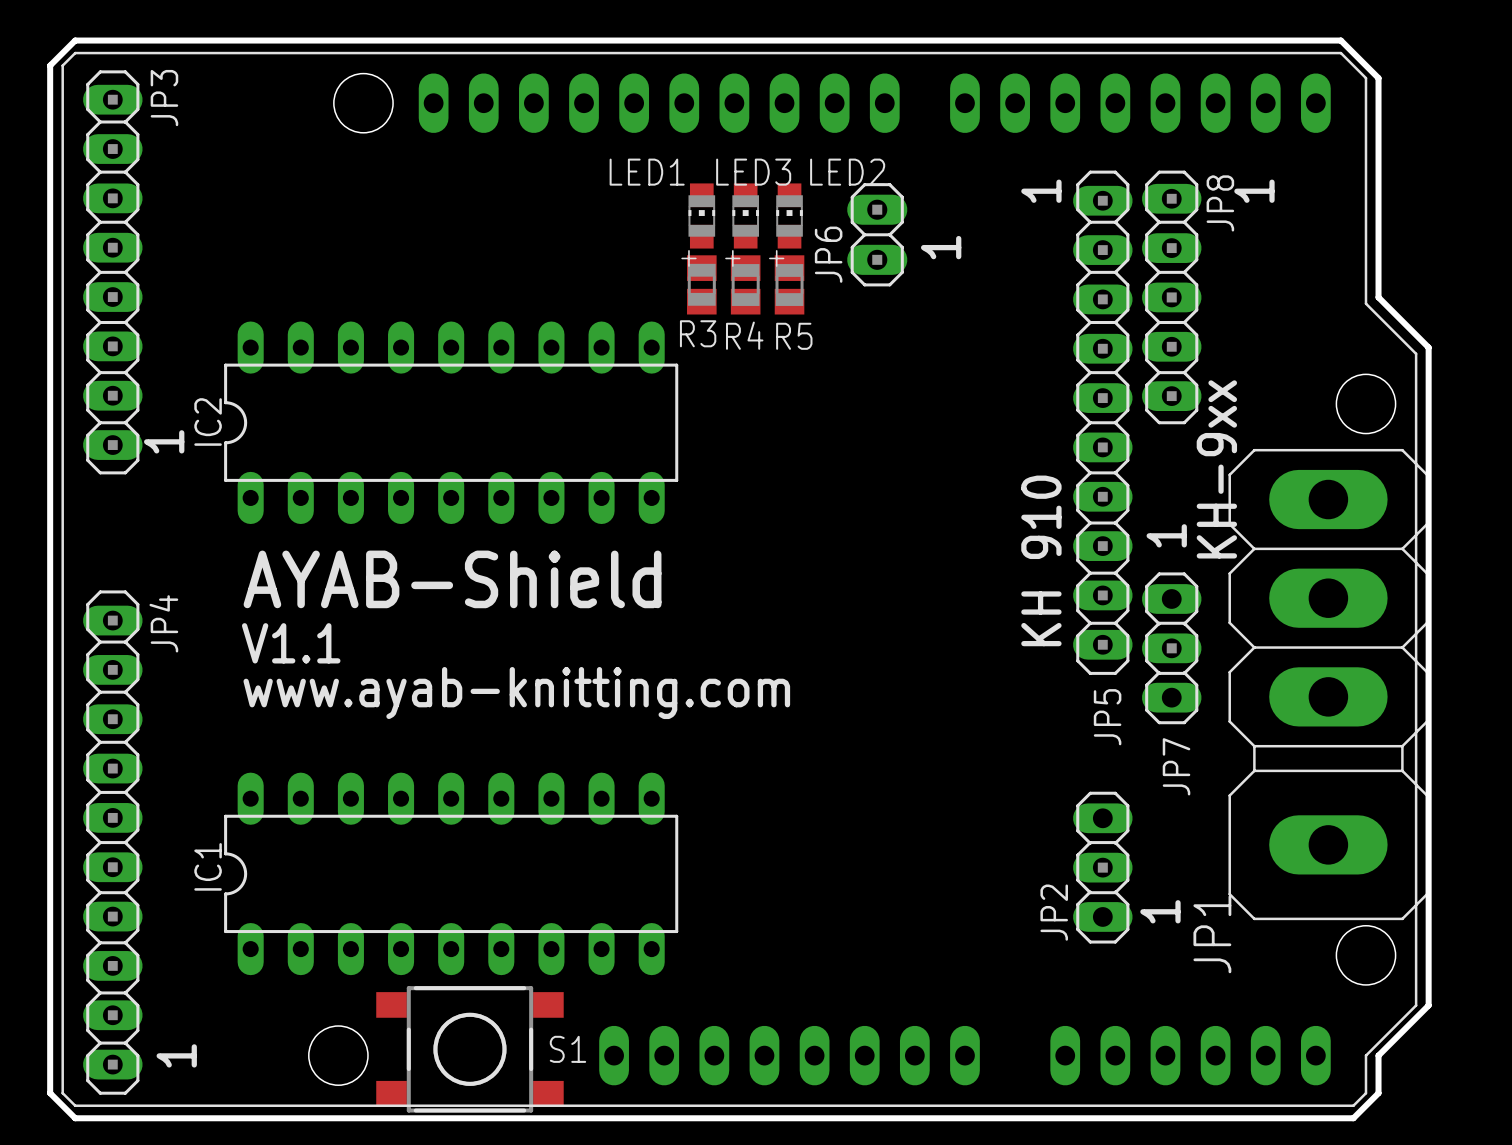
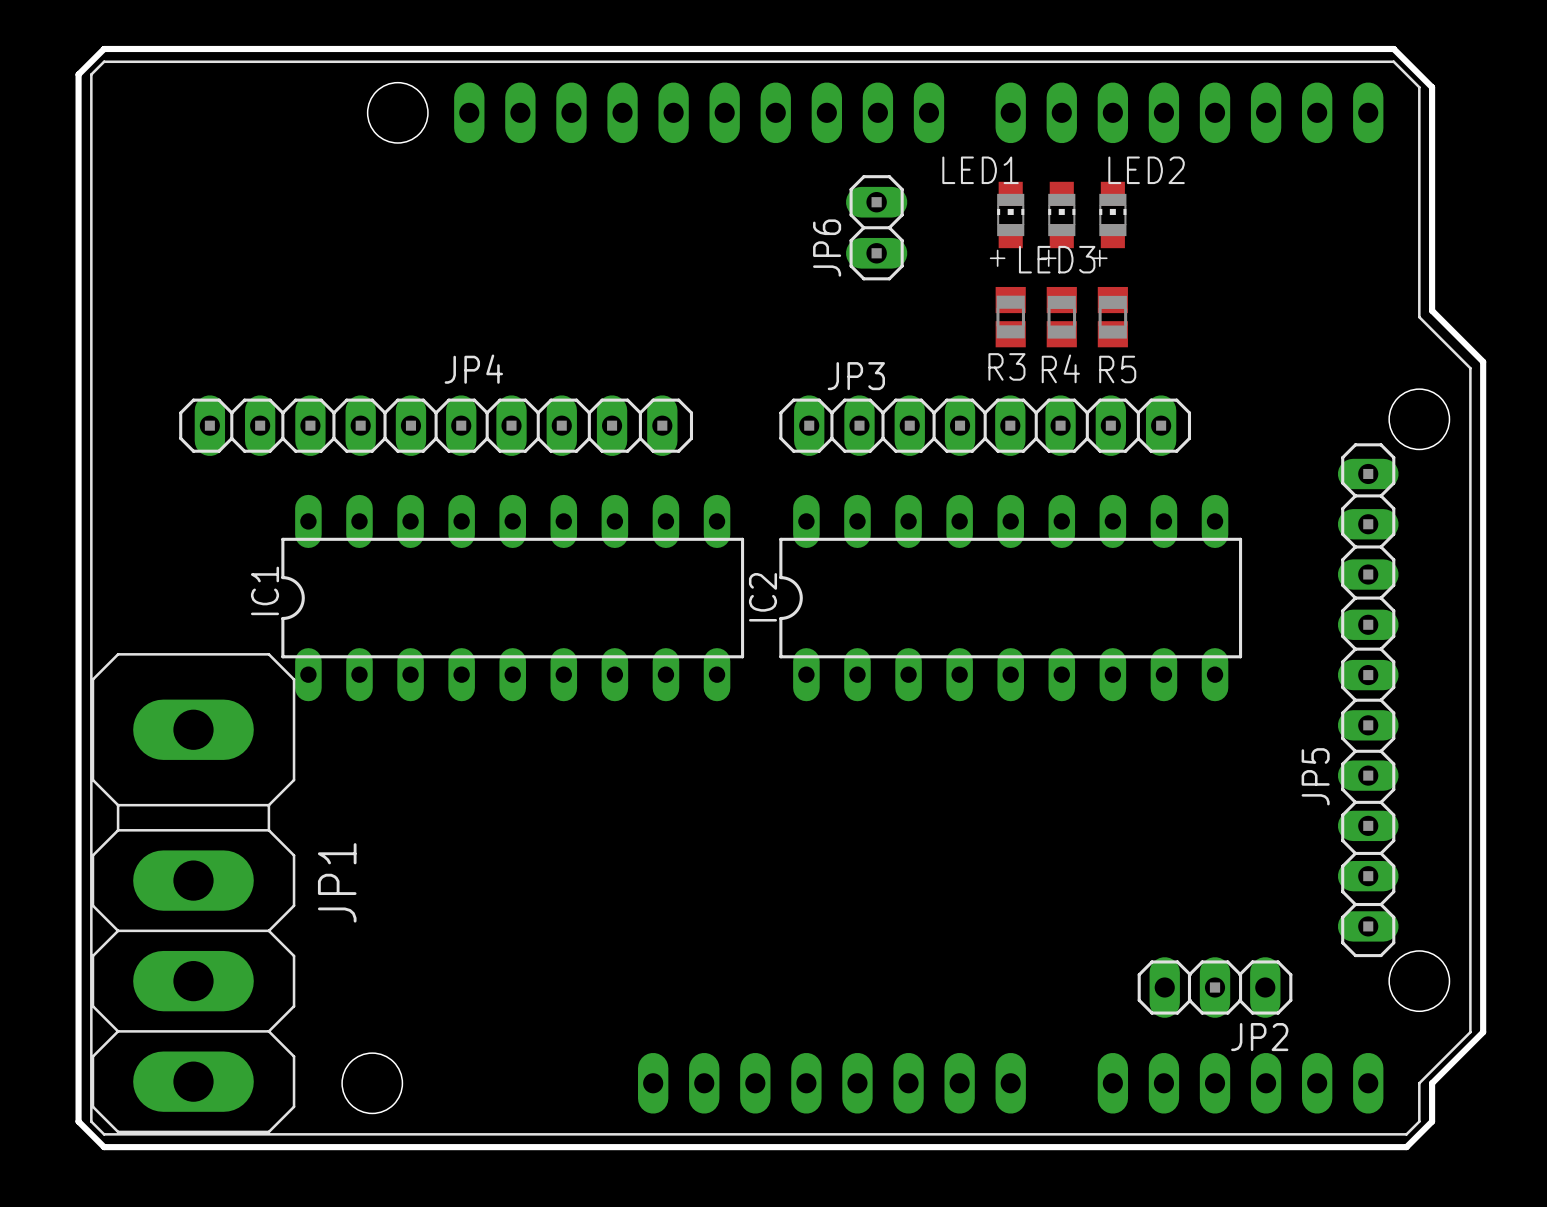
JP3 name position: JP3 (164, 98) -> JP3 (856, 376)
LED1 name position: LED1 (647, 172) -> LED1 (980, 170)
LED3 name position: LED3 (753, 172) -> LED3 (1057, 259)
LED2 name position: LED2 (847, 172) -> LED2 (1146, 170)
text: 1 (1041, 191) -> none
text: 1 (1254, 191) -> none
LED1 position: (701, 215) -> (1010, 214)
LED3 position: (745, 215) -> (1061, 214)
LED2 position: (789, 215) -> (1112, 214)
JP6 position: (877, 234) -> (876, 227)
text: 1 (941, 247) -> none
JP3 rotation: 0° (112, 272) -> 90° clockwise (985, 425)
JP3 position: (112, 272) -> (985, 425)
R3 position: (701, 284) -> (1010, 317)
R4 position: (745, 284) -> (1061, 317)
R5 position: (789, 284) -> (1112, 317)
JP8: (1171, 297) -> none
IC2 position: (451, 422) -> (1010, 598)
JP5 position: (1102, 422) -> (1368, 700)
text: 1 (164, 441) -> none
text: KH-9xx (1216, 469) -> none
text: 1 (1166, 535) -> none
text: KH 910 (1041, 560) -> none
text: AYAB-Shield (452, 579) -> none
JP4 name position: JP4 (163, 623) -> JP4 (473, 369)
text: V1.1 (291, 643) -> none
JP7: (1171, 648) -> none
JP1 rotation: 0° (1328, 684) -> 180° (193, 893)
JP1 position: (1328, 684) -> (193, 893)
text: www.ayab-knitting.com (516, 693) -> none
JP5 name position: JP5 (1107, 717) -> JP5 (1315, 776)
JP4 rotation: 0° (112, 842) -> 90° clockwise (436, 425)
JP4 position: (112, 842) -> (436, 425)
JP2 rotation: 0° (1102, 867) -> 90° clockwise (1215, 987)
JP2 position: (1102, 867) -> (1215, 987)
IC1 position: (451, 873) -> (512, 598)
text: 1 (1160, 911) -> none
JP2 name position: JP2 (1054, 912) -> JP2 (1259, 1037)
JP1 name position: JP1 (1212, 934) -> JP1 (337, 882)
S1: (469, 1049) -> none
text: 1 (176, 1055) -> none

